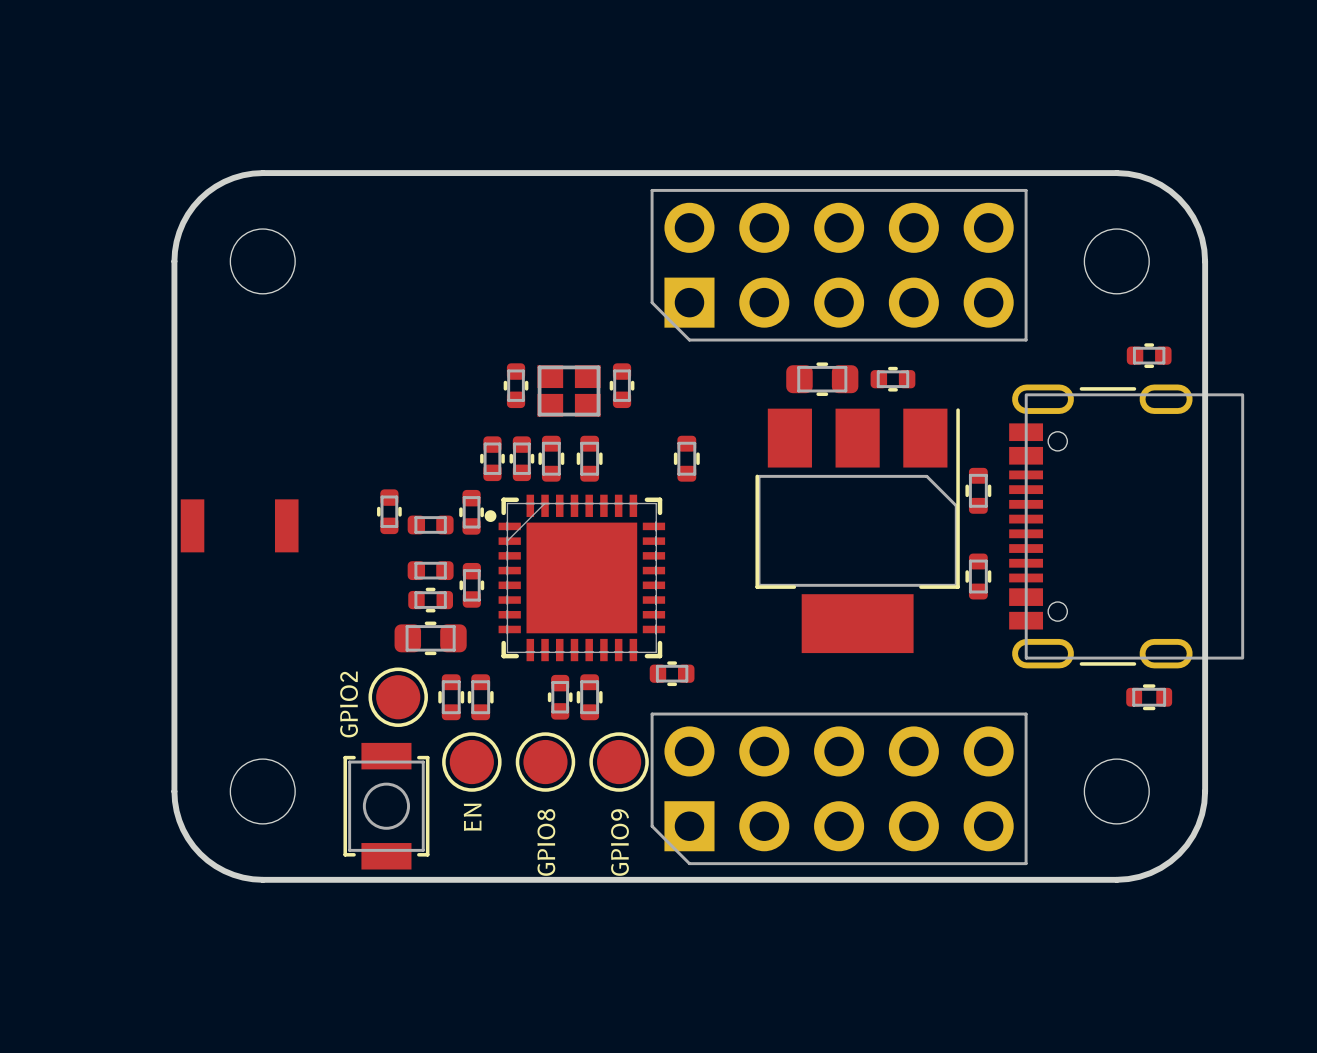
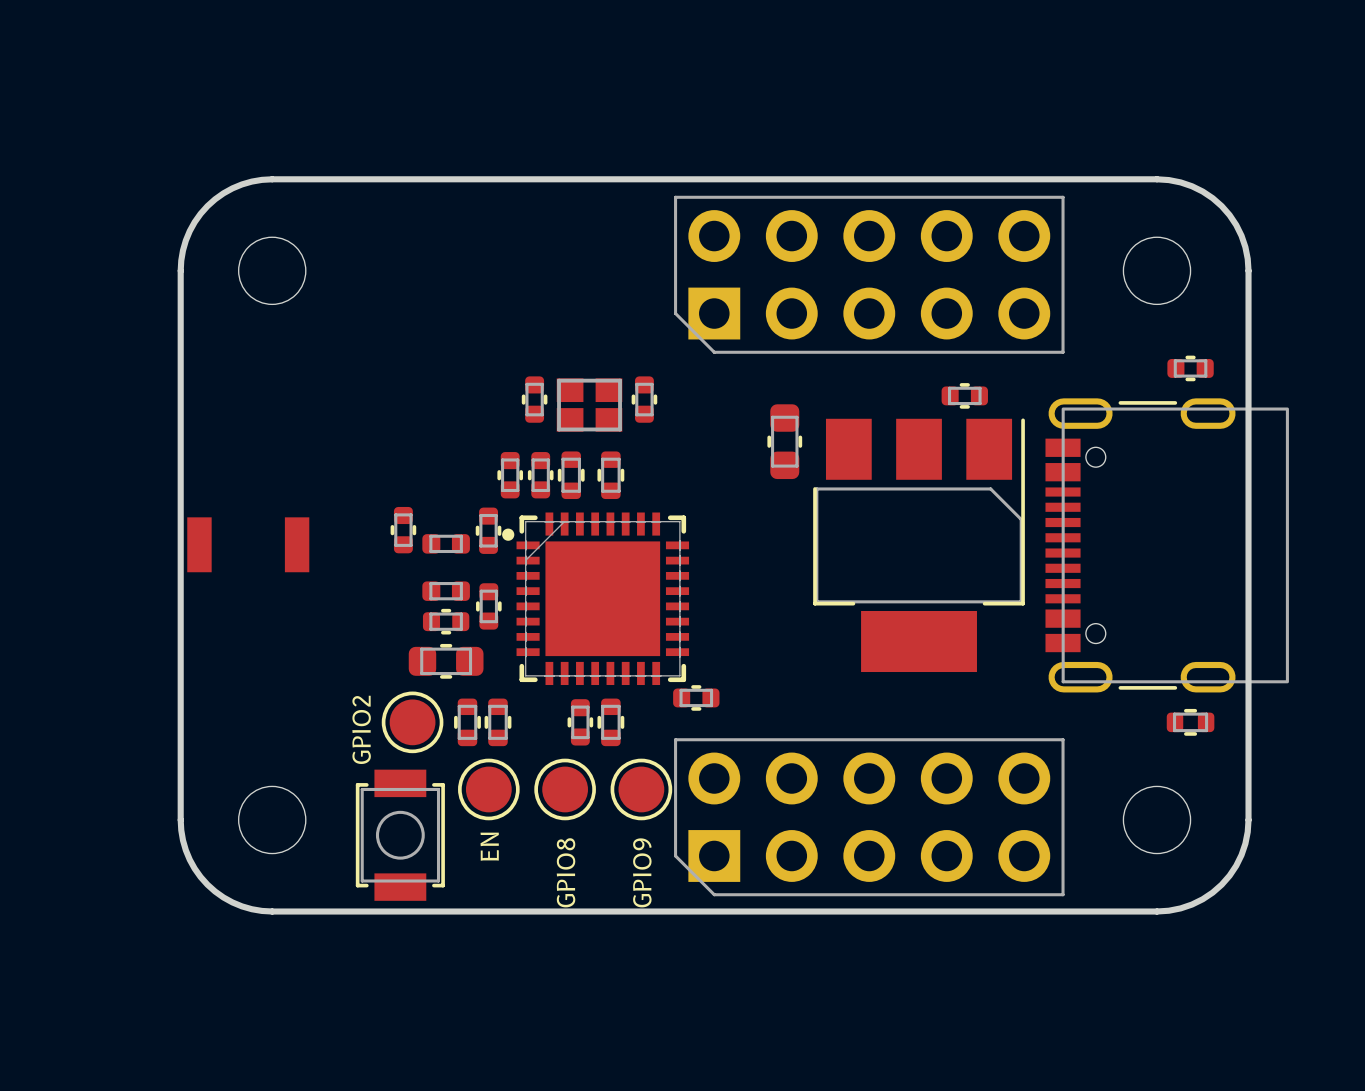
part rotation: 0° (822, 379) -> 90° clockwise (784, 441)
part position: (822, 379) -> (784, 441)
part position: (892, 379) -> (964, 395)
part: (686, 458) -> none
part: (978, 490) -> none
part position: (857, 530) -> (919, 545)
part: (978, 576) -> none

